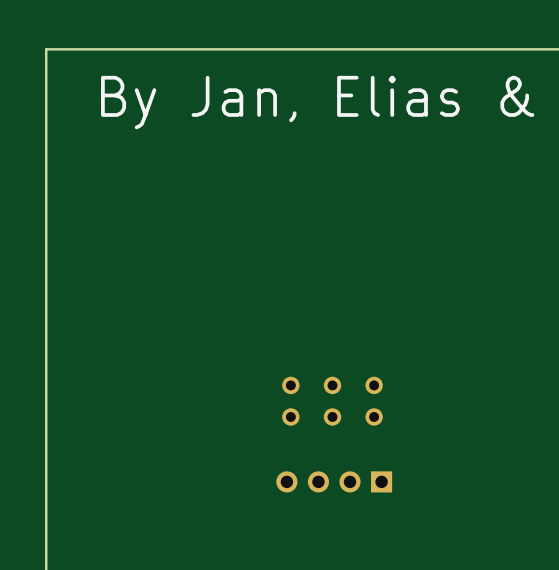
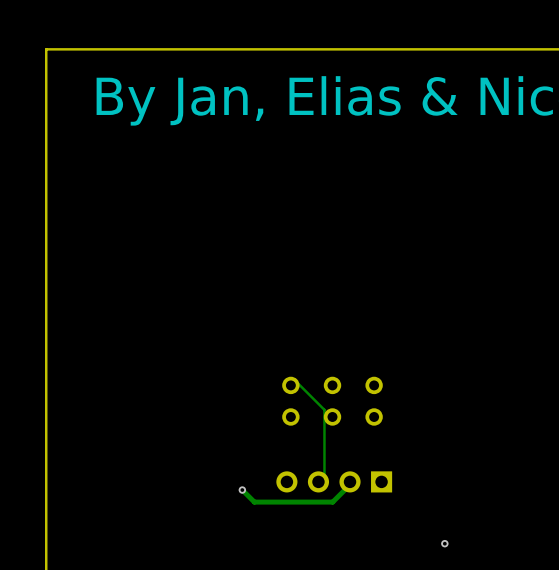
track: none -> (296, 382) (324, 409) (324, 478)
track: none -> (356, 478) (332, 502) (254, 502) (242, 490)
via: none -> (242, 490)
via: none -> (444, 543)

